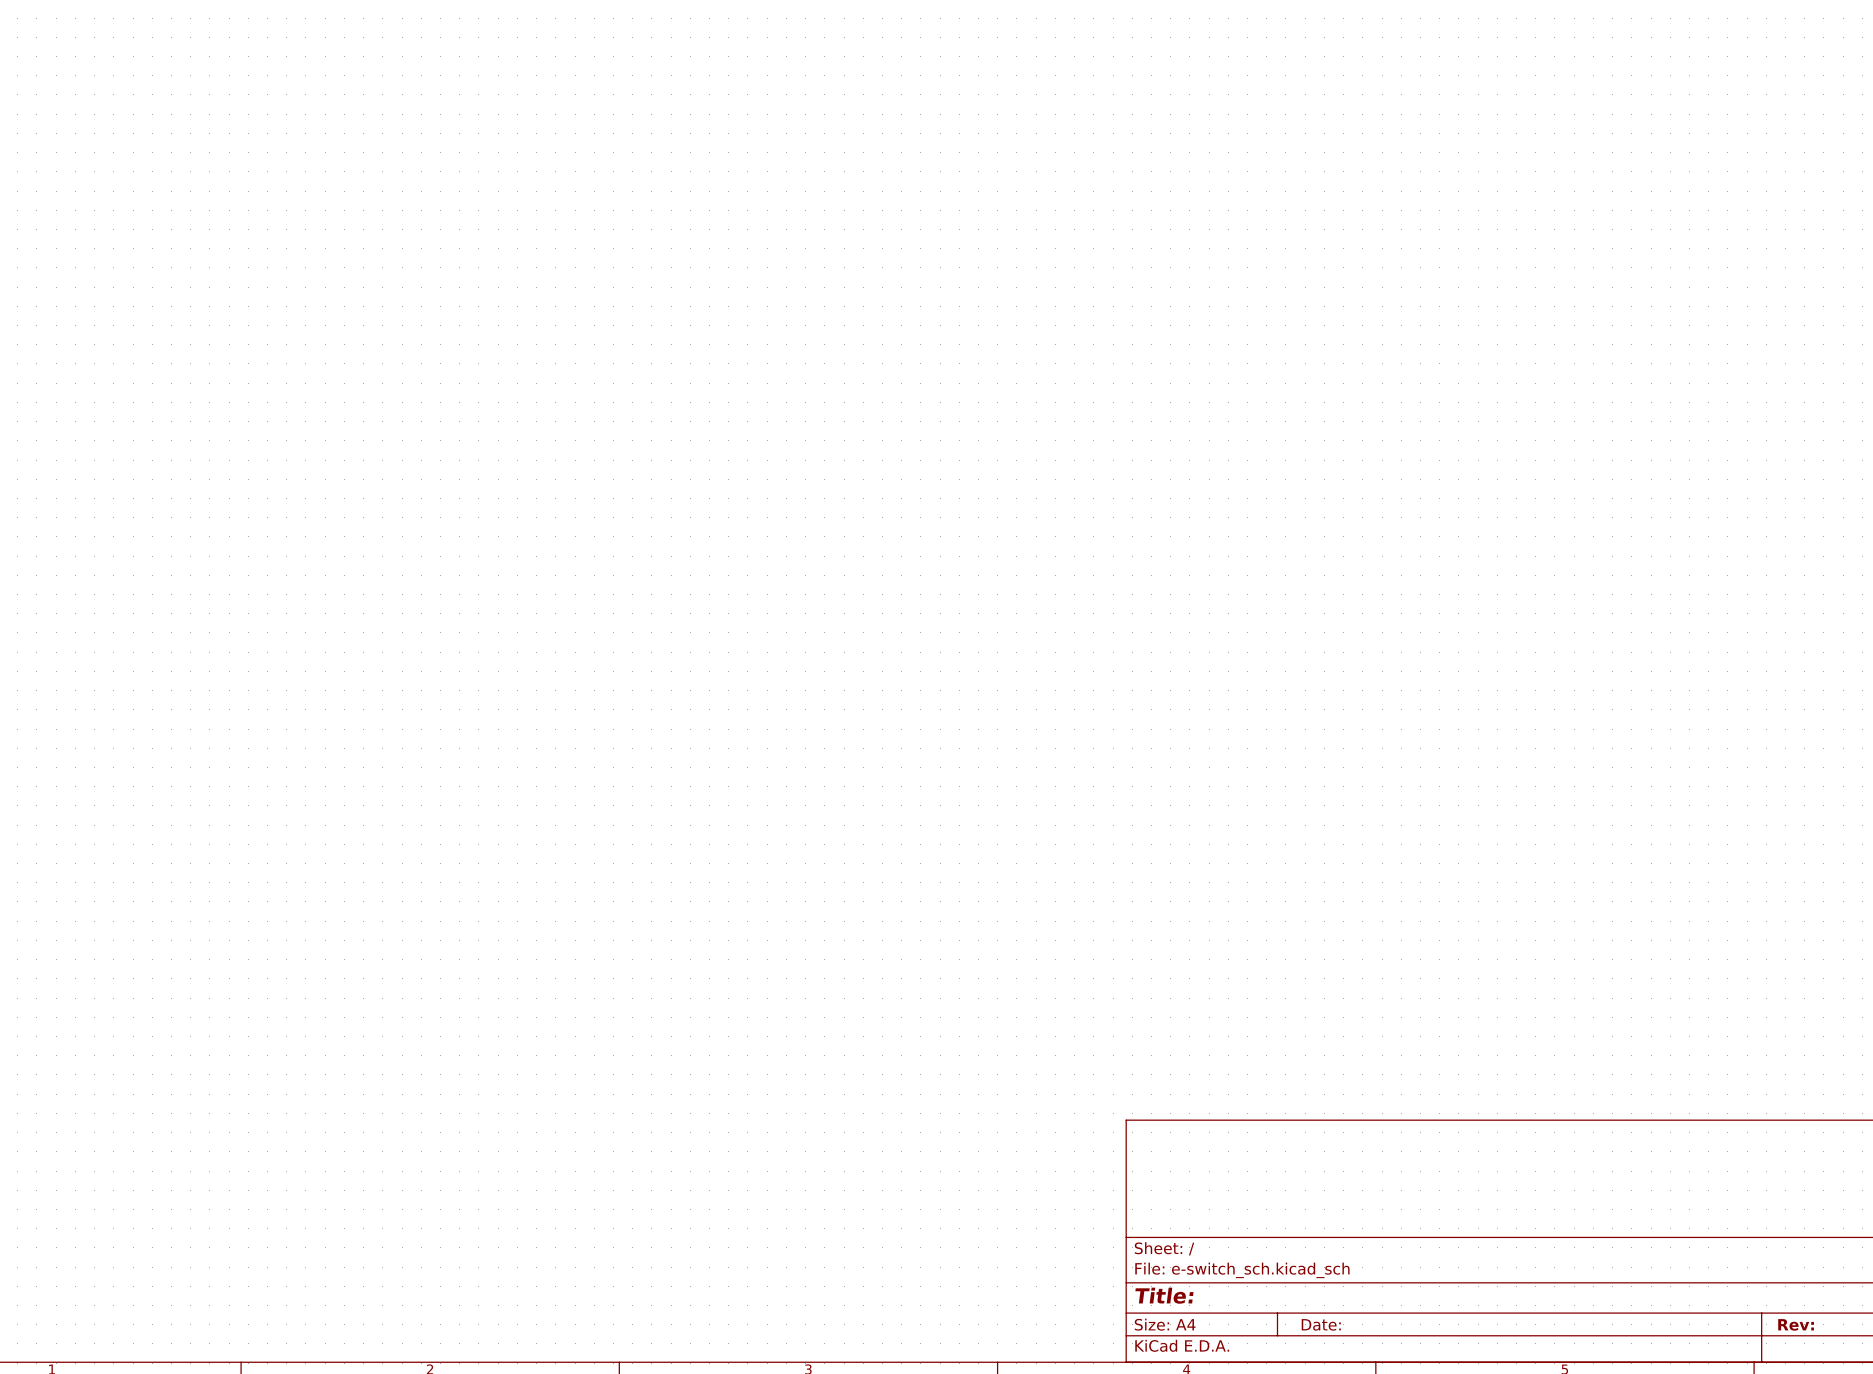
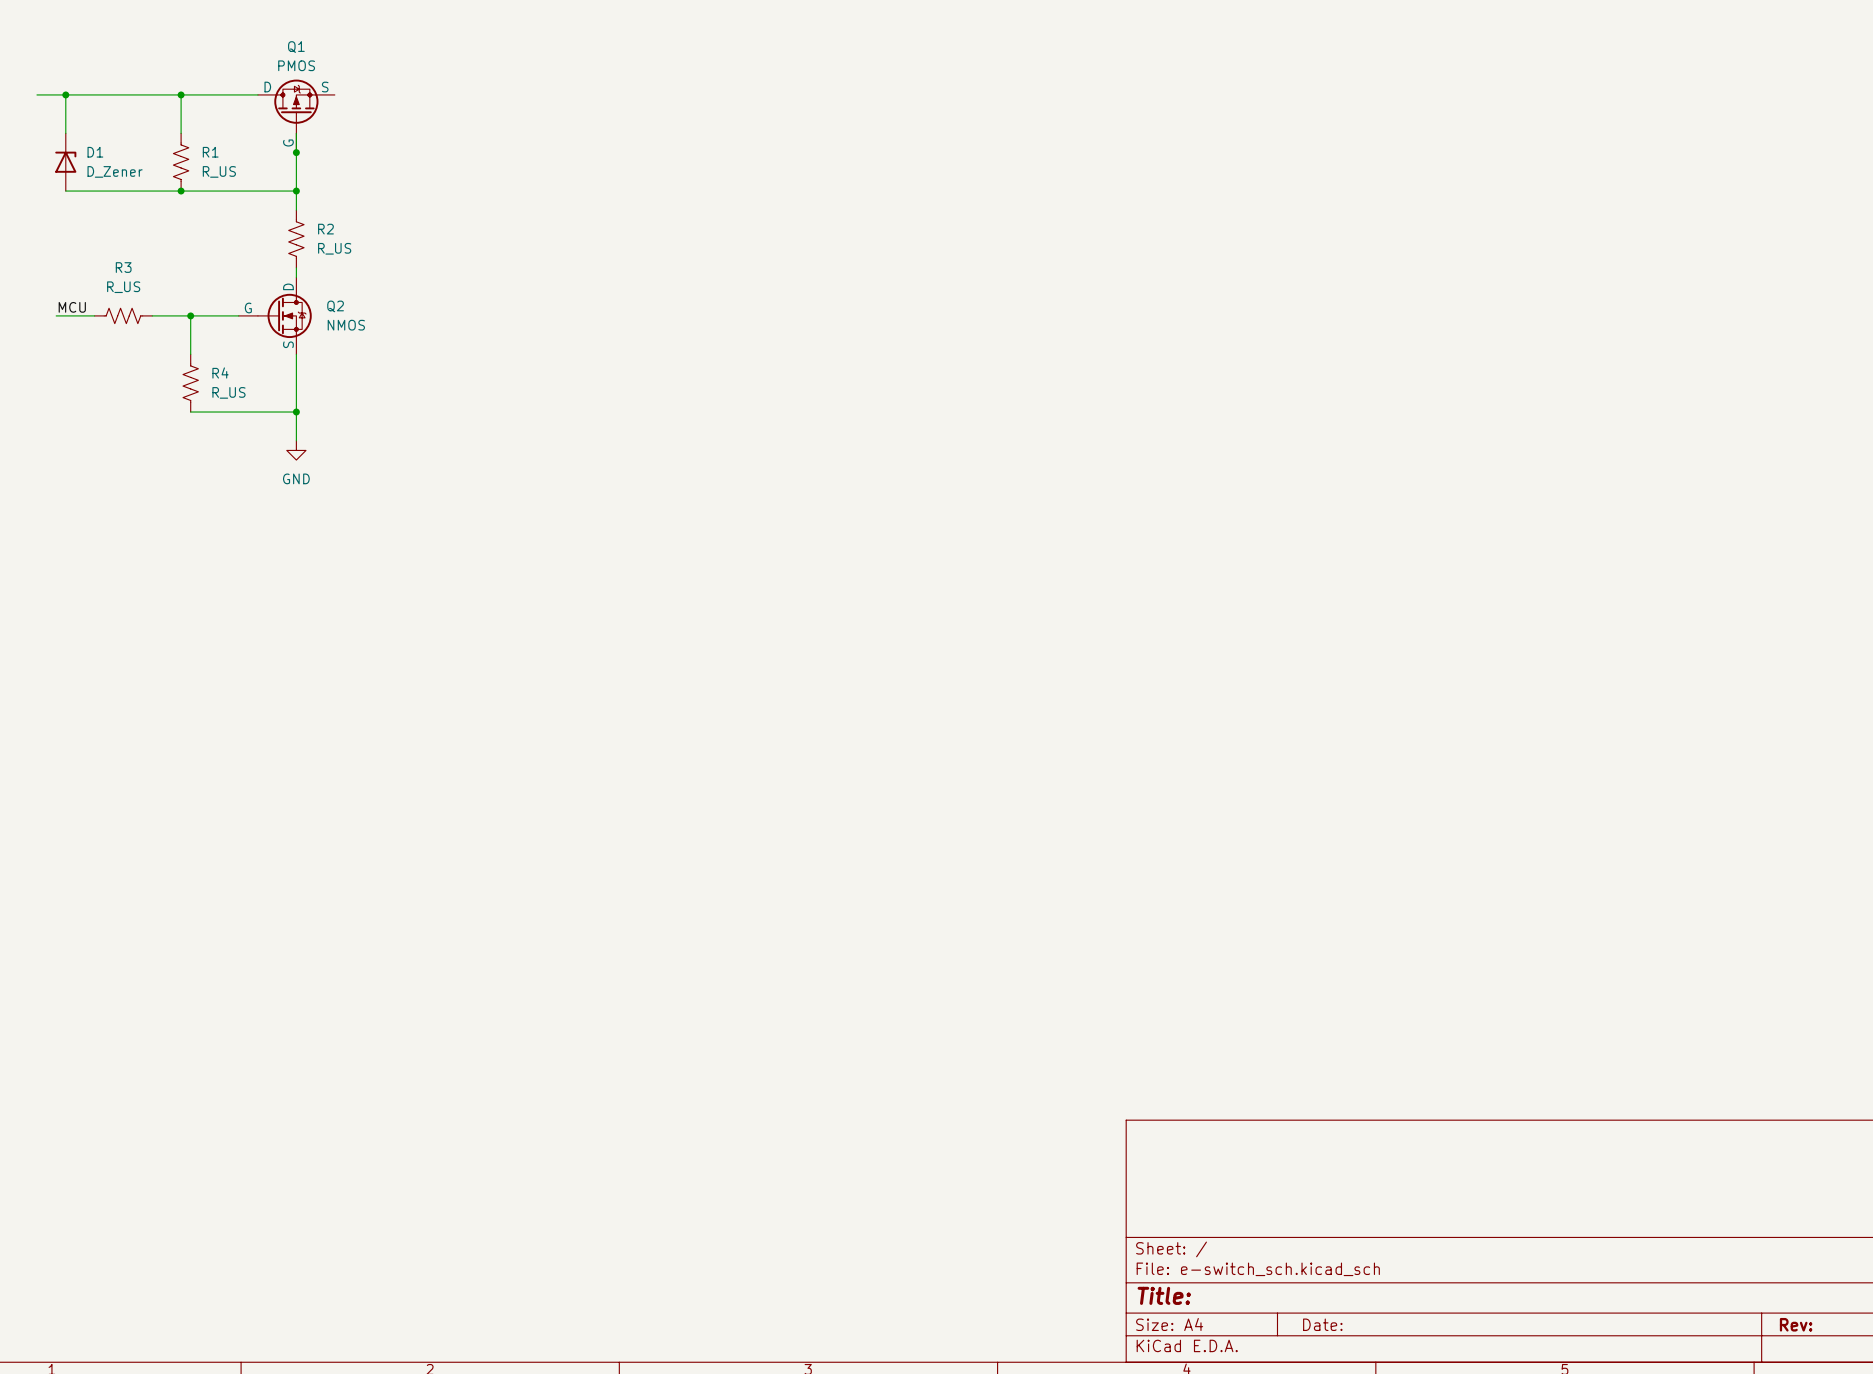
wire: none -> (36, 94) (257, 94)
wire: none -> (65, 94) (65, 133)
junction: none -> (65, 94)
wire: none -> (181, 94) (181, 133)
junction: none -> (181, 94)
Q1: none -> PMOS (296, 116)
wire: none -> (296, 133) (296, 210)
junction: none -> (296, 152)
D1: none -> D_Zener (65, 162)
R1: none -> R_US (181, 162)
wire: none -> (65, 191) (296, 191)
junction: none -> (181, 191)
junction: none -> (296, 191)
R2: none -> R_US (296, 239)
wire: none -> (296, 267) (296, 277)
label: none -> MCU (72, 307)
wire: none -> (56, 315) (94, 315)
R3: none -> R_US (123, 315)
wire: none -> (152, 315) (238, 315)
wire: none -> (190, 315) (190, 354)
junction: none -> (190, 315)
Q2: none -> NMOS (275, 315)
wire: none -> (296, 354) (296, 440)
R4: none -> R_US (190, 383)
wire: none -> (190, 412) (296, 412)
junction: none -> (296, 412)
power symbol: none -> GND (296, 450)

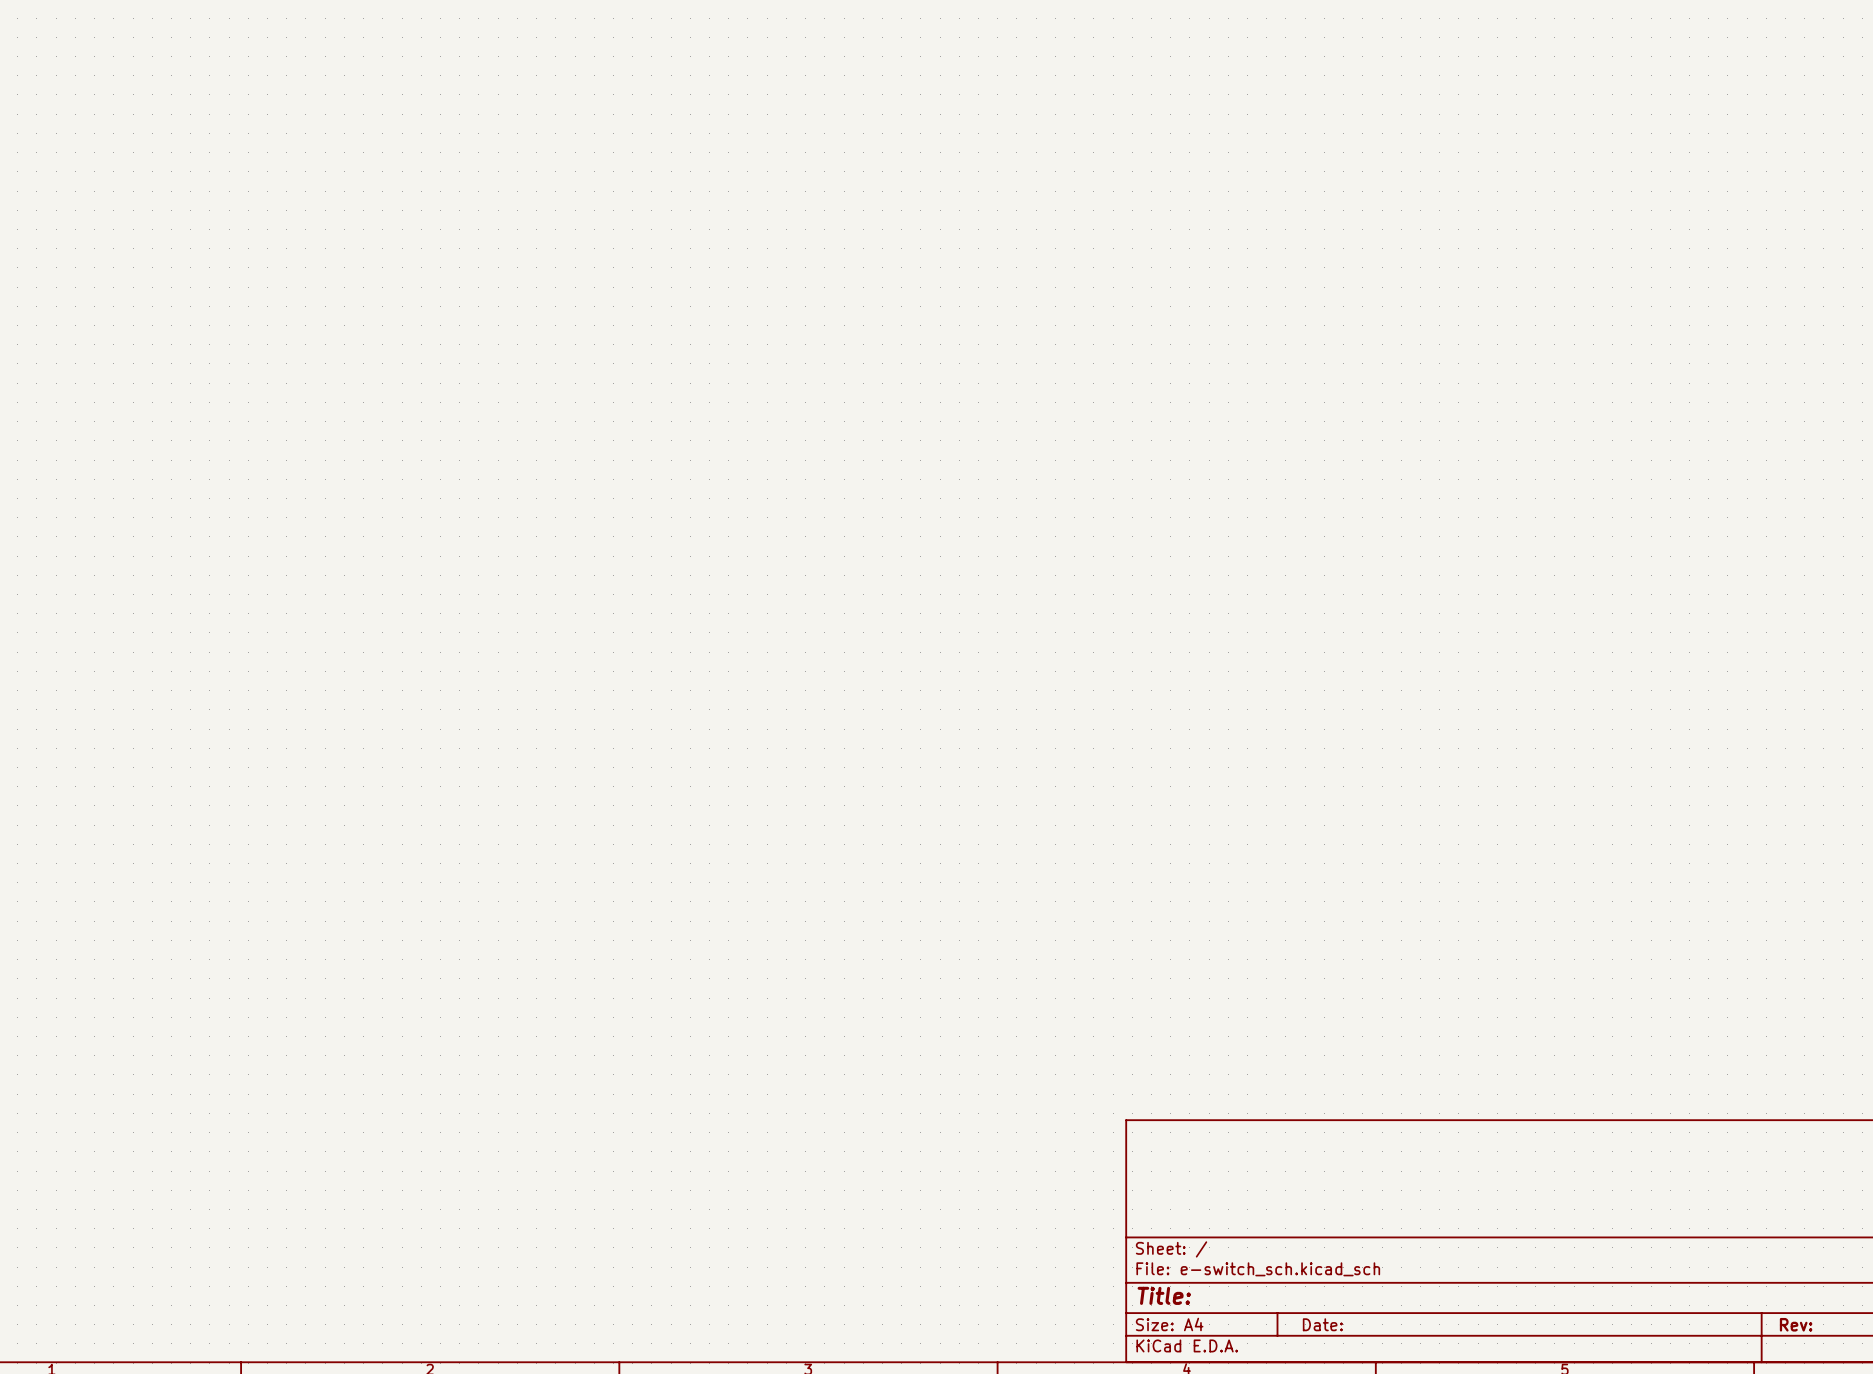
wire: (36, 94) (257, 94) -> none
wire: (65, 94) (65, 133) -> none
junction: (65, 94) -> none
wire: (181, 94) (181, 133) -> none
junction: (181, 94) -> none
Q1: PMOS (296, 116) -> none
wire: (296, 133) (296, 210) -> none
junction: (296, 152) -> none
D1: D_Zener (65, 162) -> none
R1: R_US (181, 162) -> none
wire: (65, 191) (296, 191) -> none
junction: (181, 191) -> none
junction: (296, 191) -> none
R2: R_US (296, 239) -> none
wire: (296, 267) (296, 277) -> none
label: MCU (72, 307) -> none
wire: (56, 315) (94, 315) -> none
R3: R_US (123, 315) -> none
wire: (152, 315) (238, 315) -> none
wire: (190, 315) (190, 354) -> none
junction: (190, 315) -> none
Q2: NMOS (275, 315) -> none
wire: (296, 354) (296, 440) -> none
R4: R_US (190, 383) -> none
wire: (190, 412) (296, 412) -> none
junction: (296, 412) -> none
power symbol: GND (296, 450) -> none

